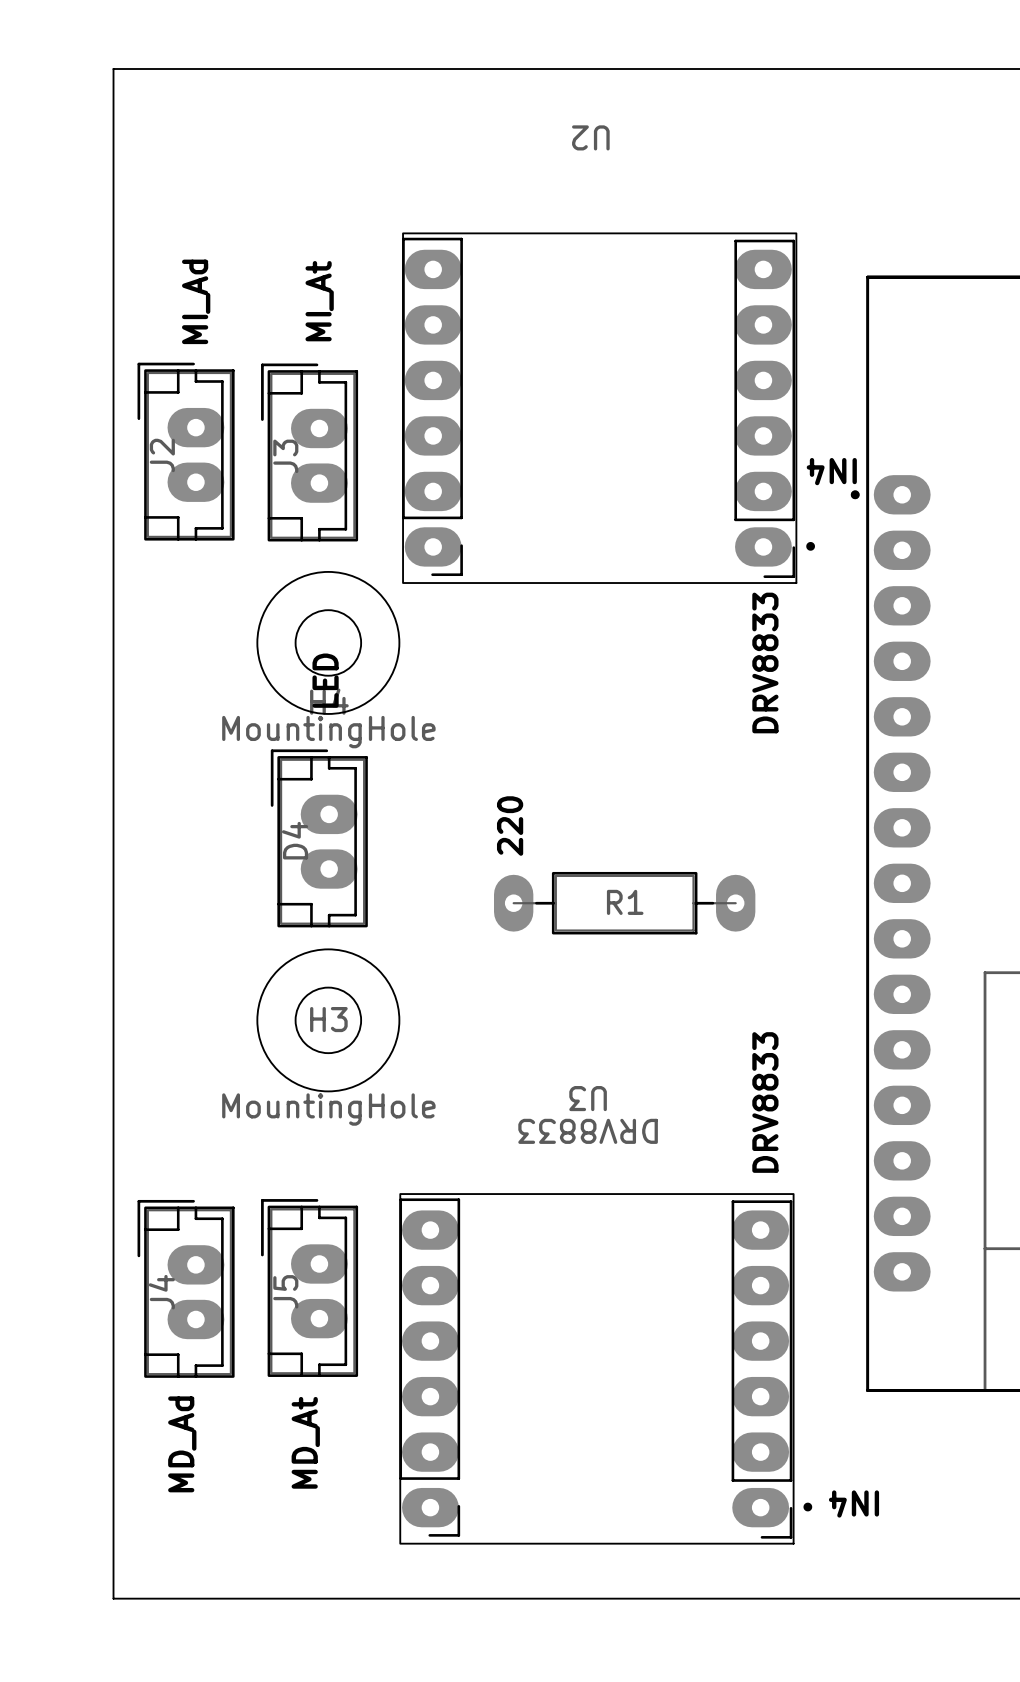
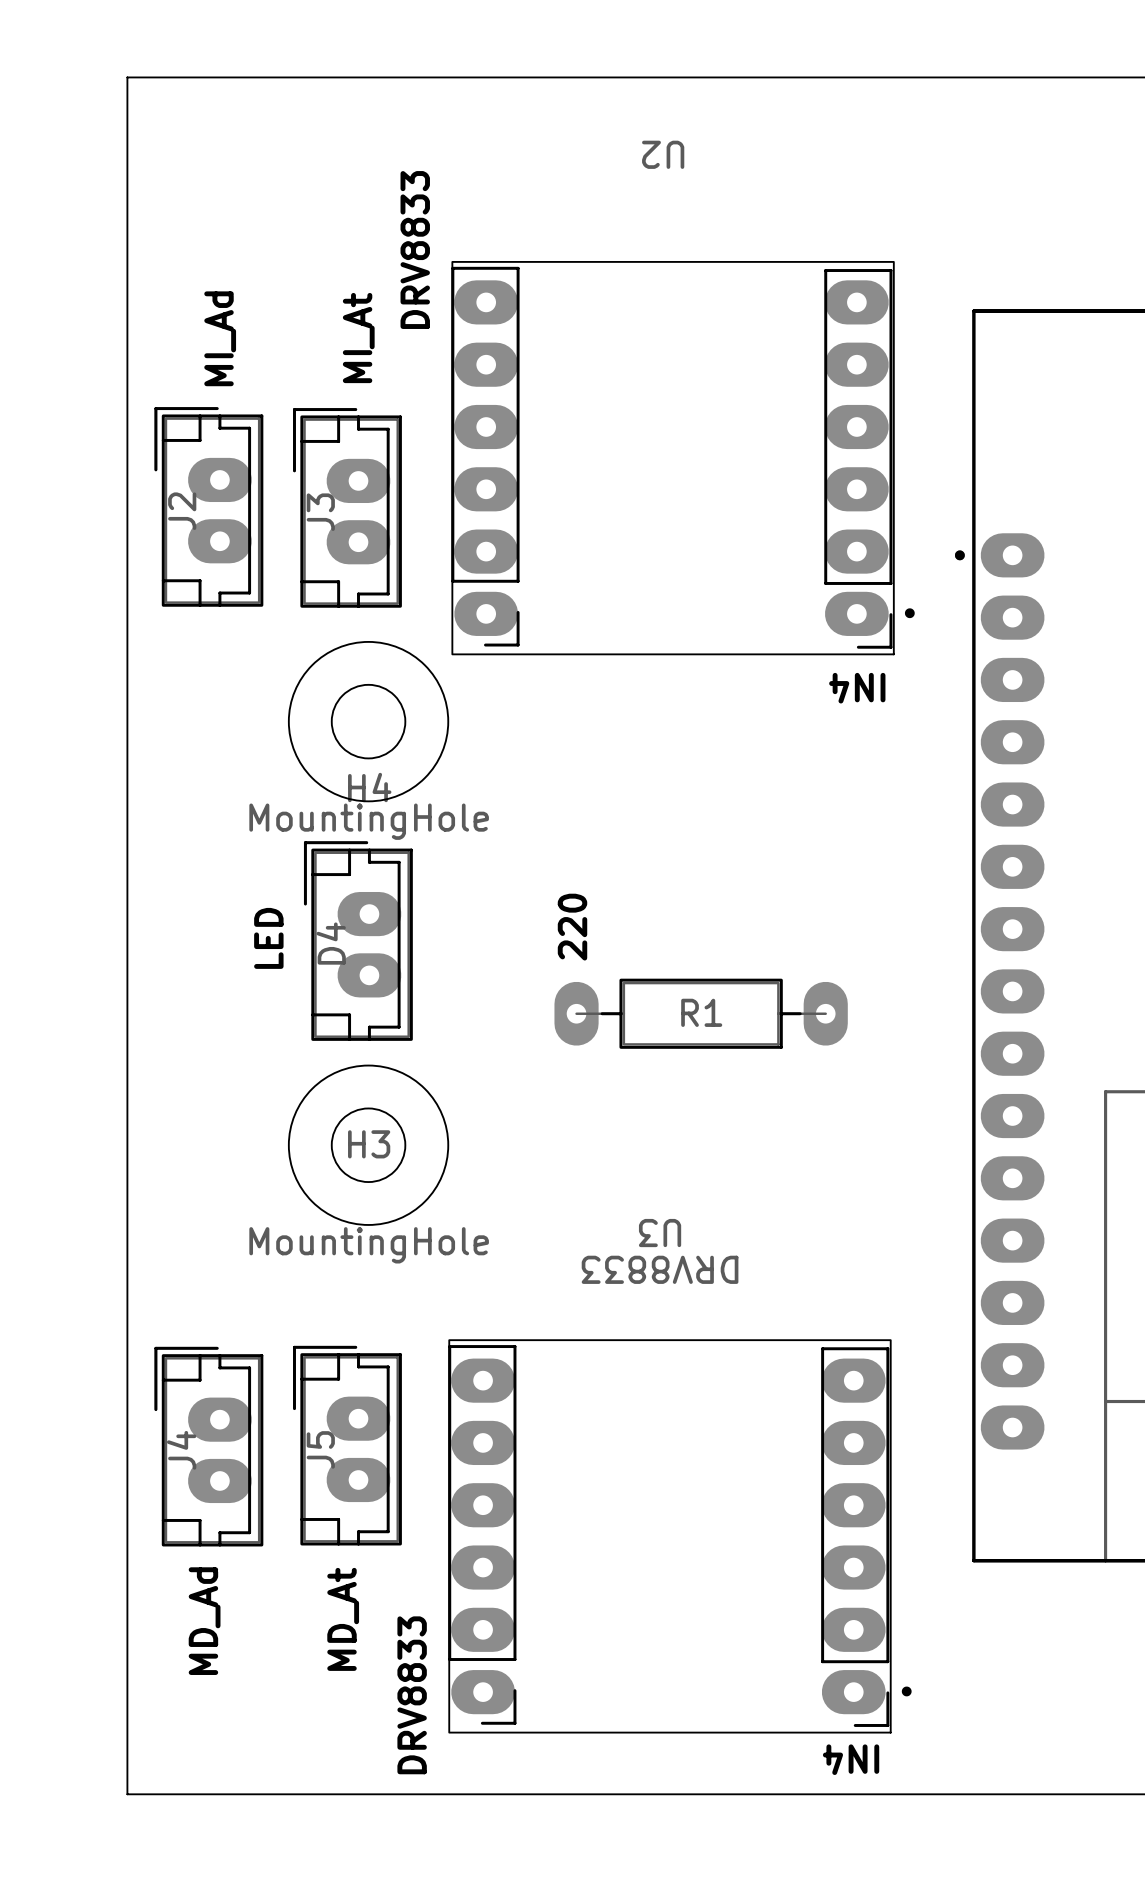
text position: IN4 (831, 471) -> IN4 (857, 688)
U2 value position: DRV8833 (765, 662) -> DRV8833 (415, 250)
D4 value position: LED (325, 680) -> LED (268, 938)
text: DRV8833 (765, 1102) -> none
text position: IN4 (853, 1503) -> IN4 (851, 1759)
text: none -> DRV8833 (412, 1695)

